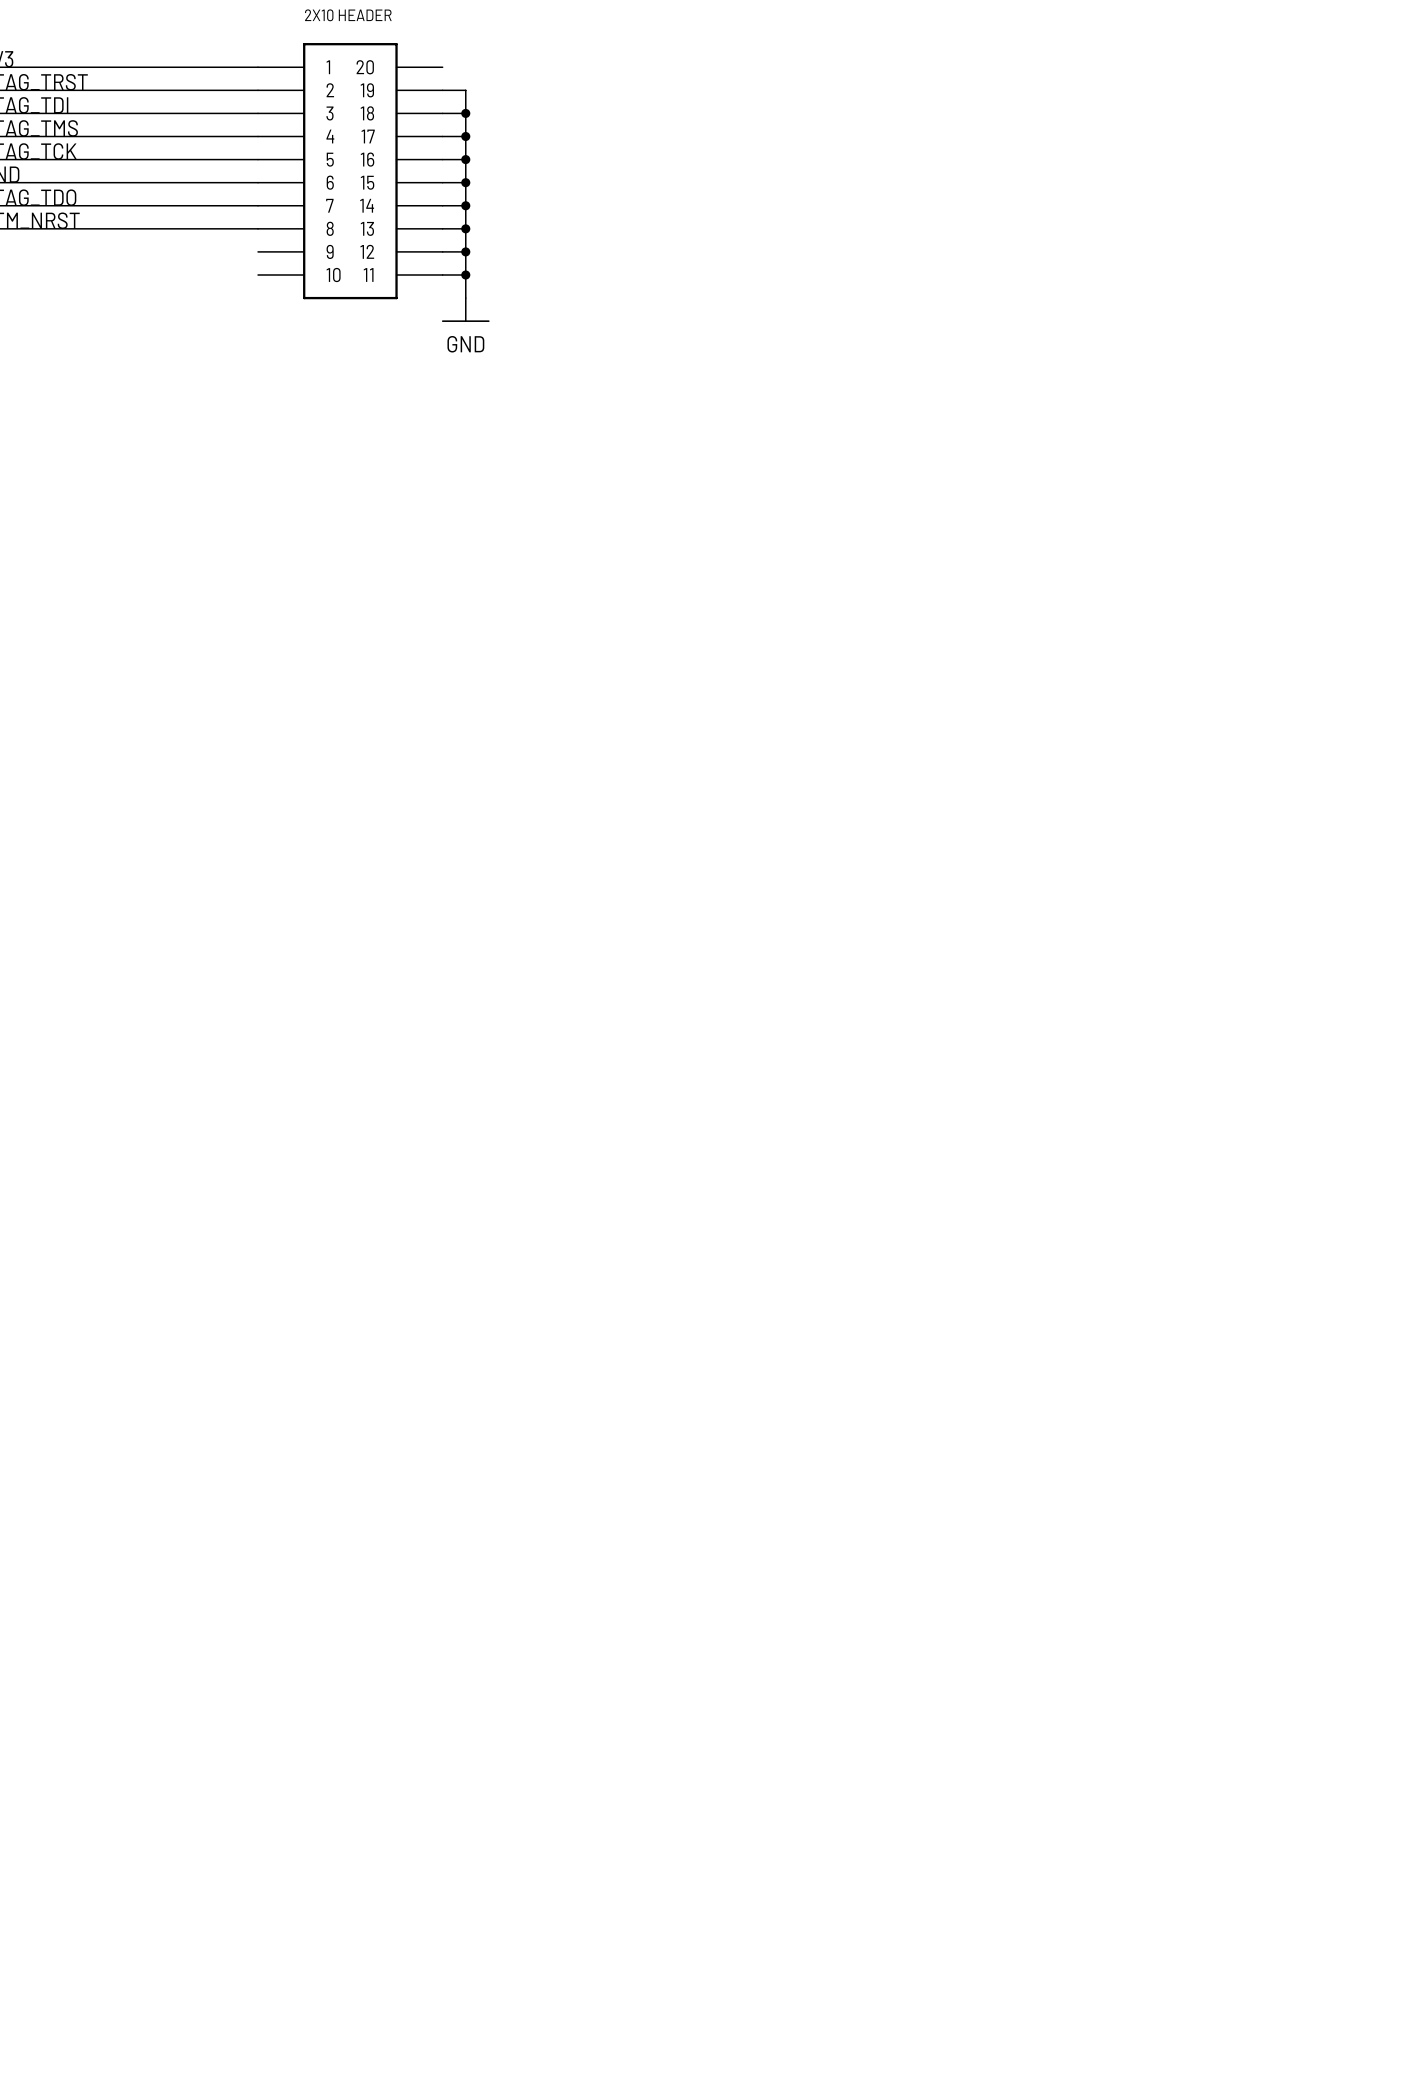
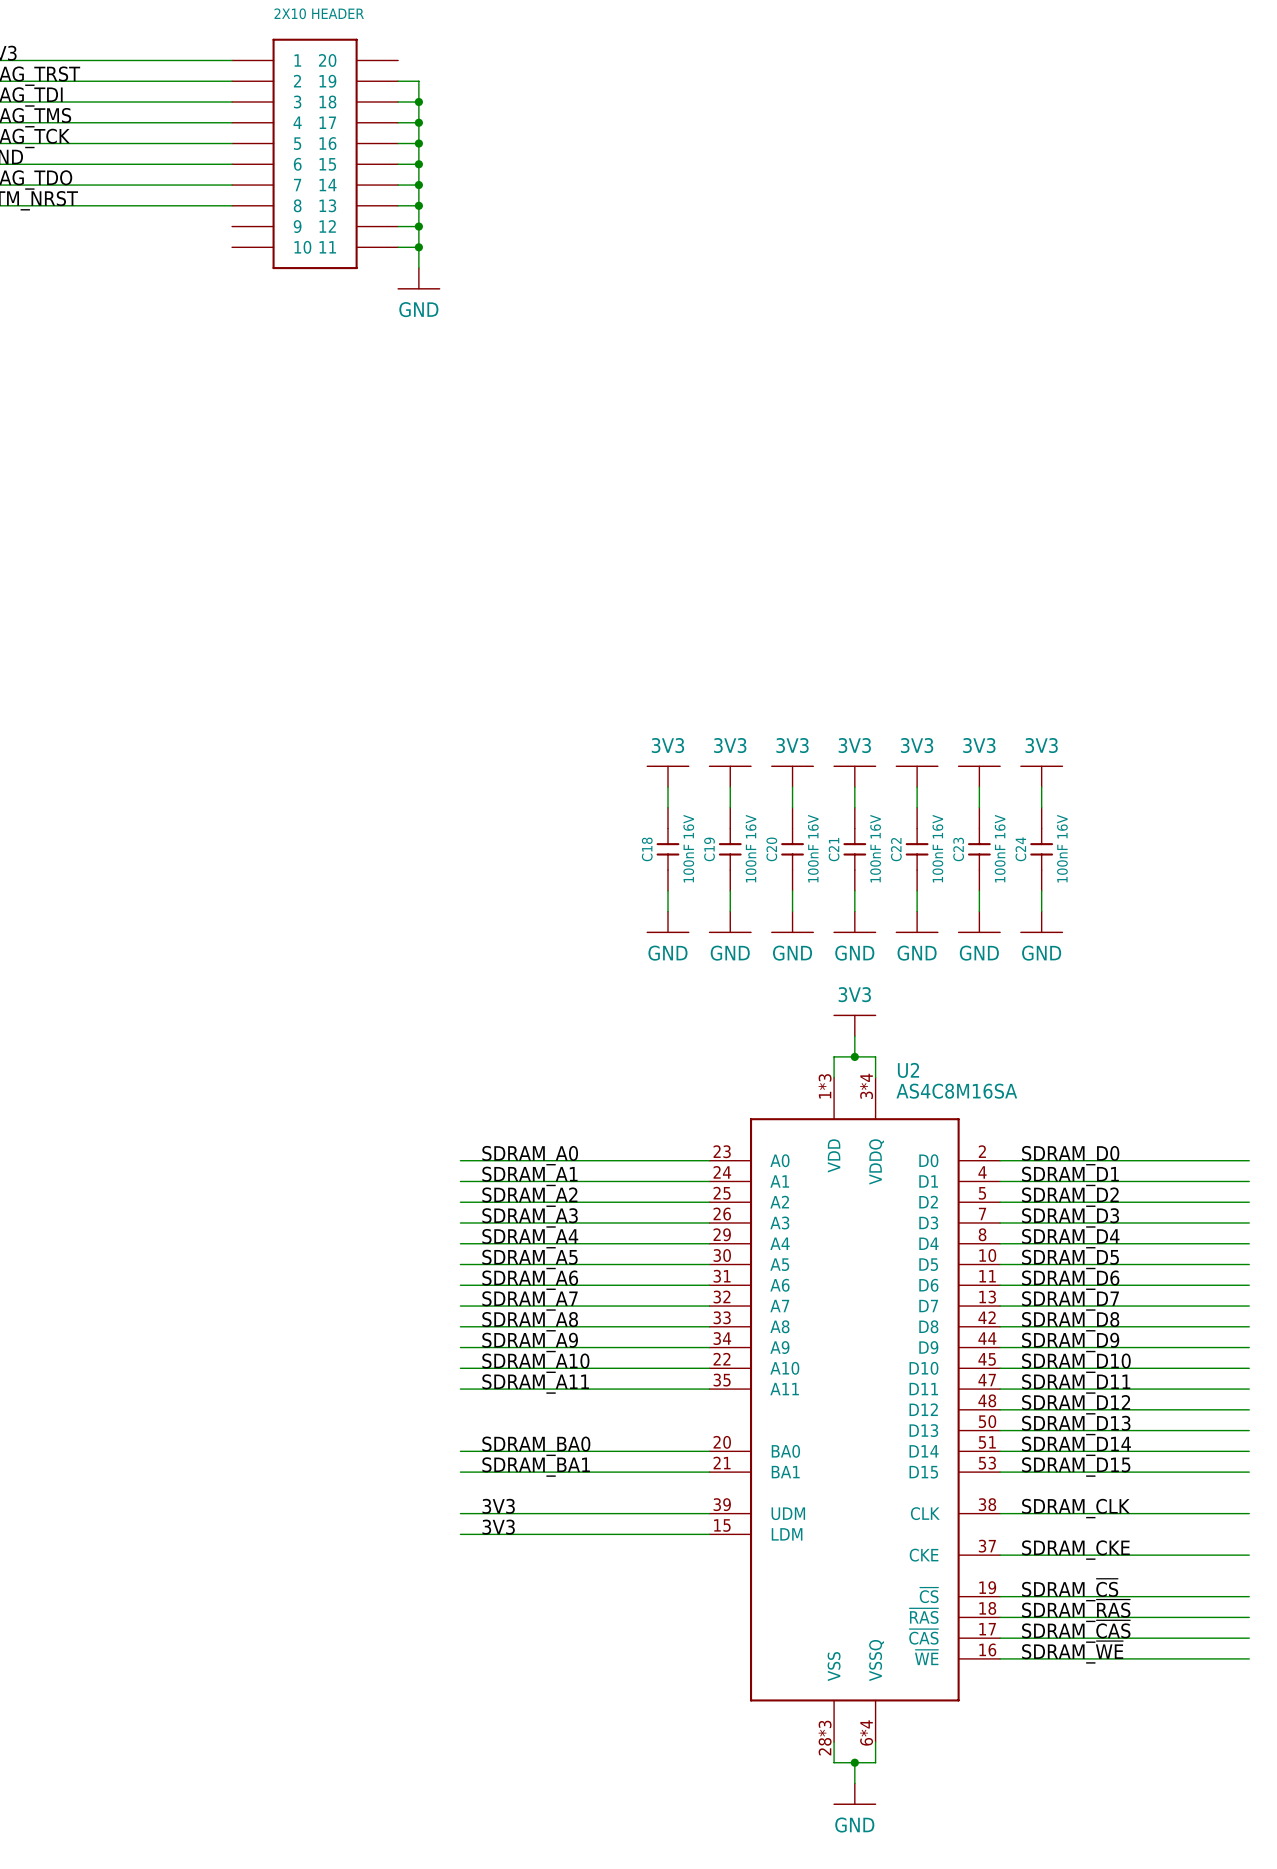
power symbol: none -> 3V3 (667, 776)
power symbol: none -> 3V3 (730, 776)
power symbol: none -> 3V3 (792, 776)
power symbol: none -> 3V3 (854, 776)
power symbol: none -> 3V3 (917, 776)
power symbol: none -> 3V3 (979, 776)
power symbol: none -> 3V3 (1041, 776)
wire: none -> (667, 787) (667, 807)
wire: none -> (730, 787) (730, 807)
wire: none -> (792, 787) (792, 807)
wire: none -> (854, 787) (854, 807)
wire: none -> (917, 787) (917, 807)
wire: none -> (979, 787) (979, 807)
wire: none -> (1041, 787) (1041, 807)
C18: none -> 100nF 16V (667, 849)
C19: none -> 100nF 16V (730, 849)
C20: none -> 100nF 16V (792, 849)
C21: none -> 100nF 16V (854, 849)
C22: none -> 100nF 16V (917, 849)
C23: none -> 100nF 16V (979, 849)
C24: none -> 100nF 16V (1041, 849)
wire: none -> (667, 890) (667, 911)
wire: none -> (730, 890) (730, 911)
wire: none -> (792, 890) (792, 911)
wire: none -> (854, 890) (854, 911)
wire: none -> (917, 890) (917, 911)
wire: none -> (979, 890) (979, 911)
wire: none -> (1041, 890) (1041, 911)
power symbol: none -> GND (667, 922)
power symbol: none -> GND (730, 922)
power symbol: none -> GND (792, 922)
power symbol: none -> GND (854, 922)
power symbol: none -> GND (917, 922)
power symbol: none -> GND (979, 922)
power symbol: none -> GND (1041, 922)
power symbol: none -> 3V3 (854, 1025)
wire: none -> (854, 1036) (854, 1056)
junction: none -> (854, 1056)
wire: none -> (834, 1077) (834, 1056) (875, 1056) (875, 1077)
label: none -> SDRAM_A0 (530, 1155)
label: none -> SDRAM_D0 (1070, 1155)
wire: none -> (460, 1160) (709, 1160)
wire: none -> (1000, 1160) (1249, 1160)
label: none -> SDRAM_A1 (529, 1176)
label: none -> SDRAM_D1 (1070, 1176)
wire: none -> (460, 1181) (709, 1181)
wire: none -> (1000, 1181) (1249, 1181)
label: none -> SDRAM_A2 (529, 1197)
label: none -> SDRAM_D2 (1070, 1197)
wire: none -> (460, 1202) (709, 1202)
wire: none -> (1000, 1202) (1249, 1202)
label: none -> SDRAM_A3 (530, 1217)
label: none -> SDRAM_D3 (1070, 1217)
wire: none -> (460, 1222) (709, 1222)
wire: none -> (1000, 1222) (1249, 1222)
label: none -> SDRAM_A4 (530, 1238)
label: none -> SDRAM_D4 (1070, 1238)
wire: none -> (460, 1243) (709, 1243)
wire: none -> (1000, 1243) (1249, 1243)
label: none -> SDRAM_A5 (530, 1259)
label: none -> SDRAM_D5 (1070, 1259)
wire: none -> (460, 1264) (709, 1264)
wire: none -> (1000, 1264) (1249, 1264)
label: none -> SDRAM_A6 (530, 1280)
label: none -> SDRAM_D6 (1070, 1280)
wire: none -> (460, 1285) (709, 1285)
wire: none -> (1000, 1285) (1249, 1285)
label: none -> SDRAM_A7 (530, 1300)
label: none -> SDRAM_D7 (1070, 1300)
wire: none -> (460, 1306) (709, 1306)
wire: none -> (1000, 1306) (1249, 1306)
label: none -> SDRAM_A8 (530, 1321)
label: none -> SDRAM_D8 (1070, 1321)
wire: none -> (460, 1326) (709, 1326)
wire: none -> (1000, 1326) (1249, 1326)
label: none -> SDRAM_A9 (530, 1342)
label: none -> SDRAM_D9 (1070, 1342)
wire: none -> (460, 1347) (709, 1347)
wire: none -> (1000, 1347) (1249, 1347)
label: none -> SDRAM_A10 (535, 1363)
label: none -> SDRAM_D10 (1076, 1363)
wire: none -> (460, 1368) (709, 1368)
wire: none -> (1000, 1368) (1249, 1368)
label: none -> SDRAM_A11 (535, 1384)
label: none -> SDRAM_D11 (1076, 1384)
wire: none -> (460, 1389) (709, 1389)
wire: none -> (1000, 1389) (1249, 1389)
label: none -> SDRAM_D12 (1076, 1404)
U2: none -> AS4C8M16SA (854, 1409)
wire: none -> (1000, 1409) (1249, 1409)
label: none -> SDRAM_D13 (1076, 1425)
wire: none -> (1000, 1430) (1249, 1430)
label: none -> SDRAM_BA0 (536, 1446)
label: none -> SDRAM_D14 (1076, 1446)
wire: none -> (460, 1451) (709, 1451)
wire: none -> (1000, 1451) (1249, 1451)
label: none -> SDRAM_BA1 (536, 1467)
label: none -> SDRAM_D15 (1076, 1467)
wire: none -> (460, 1472) (709, 1472)
wire: none -> (1000, 1472) (1249, 1472)
label: none -> SDRAM_CLK (1076, 1508)
label: none -> 3V3 (498, 1506)
wire: none -> (460, 1513) (709, 1513)
wire: none -> (1000, 1513) (1249, 1513)
label: none -> 3V3 (498, 1527)
wire: none -> (460, 1534) (709, 1534)
label: none -> SDRAM_CKE (1075, 1550)
wire: none -> (1000, 1555) (1249, 1555)
label: none -> SDRAM_~{CS} (1070, 1590)
wire: none -> (1000, 1596) (1249, 1596)
label: none -> SDRAM_~{RAS} (1076, 1610)
wire: none -> (1000, 1617) (1249, 1617)
label: none -> SDRAM_~{CAS} (1076, 1631)
wire: none -> (1000, 1638) (1249, 1638)
label: none -> SDRAM_~{WE} (1072, 1652)
wire: none -> (1000, 1658) (1249, 1658)
wire: none -> (834, 1741) (834, 1762) (875, 1762) (875, 1741)
wire: none -> (854, 1762) (854, 1783)
junction: none -> (854, 1762)
power symbol: none -> GND (854, 1794)

